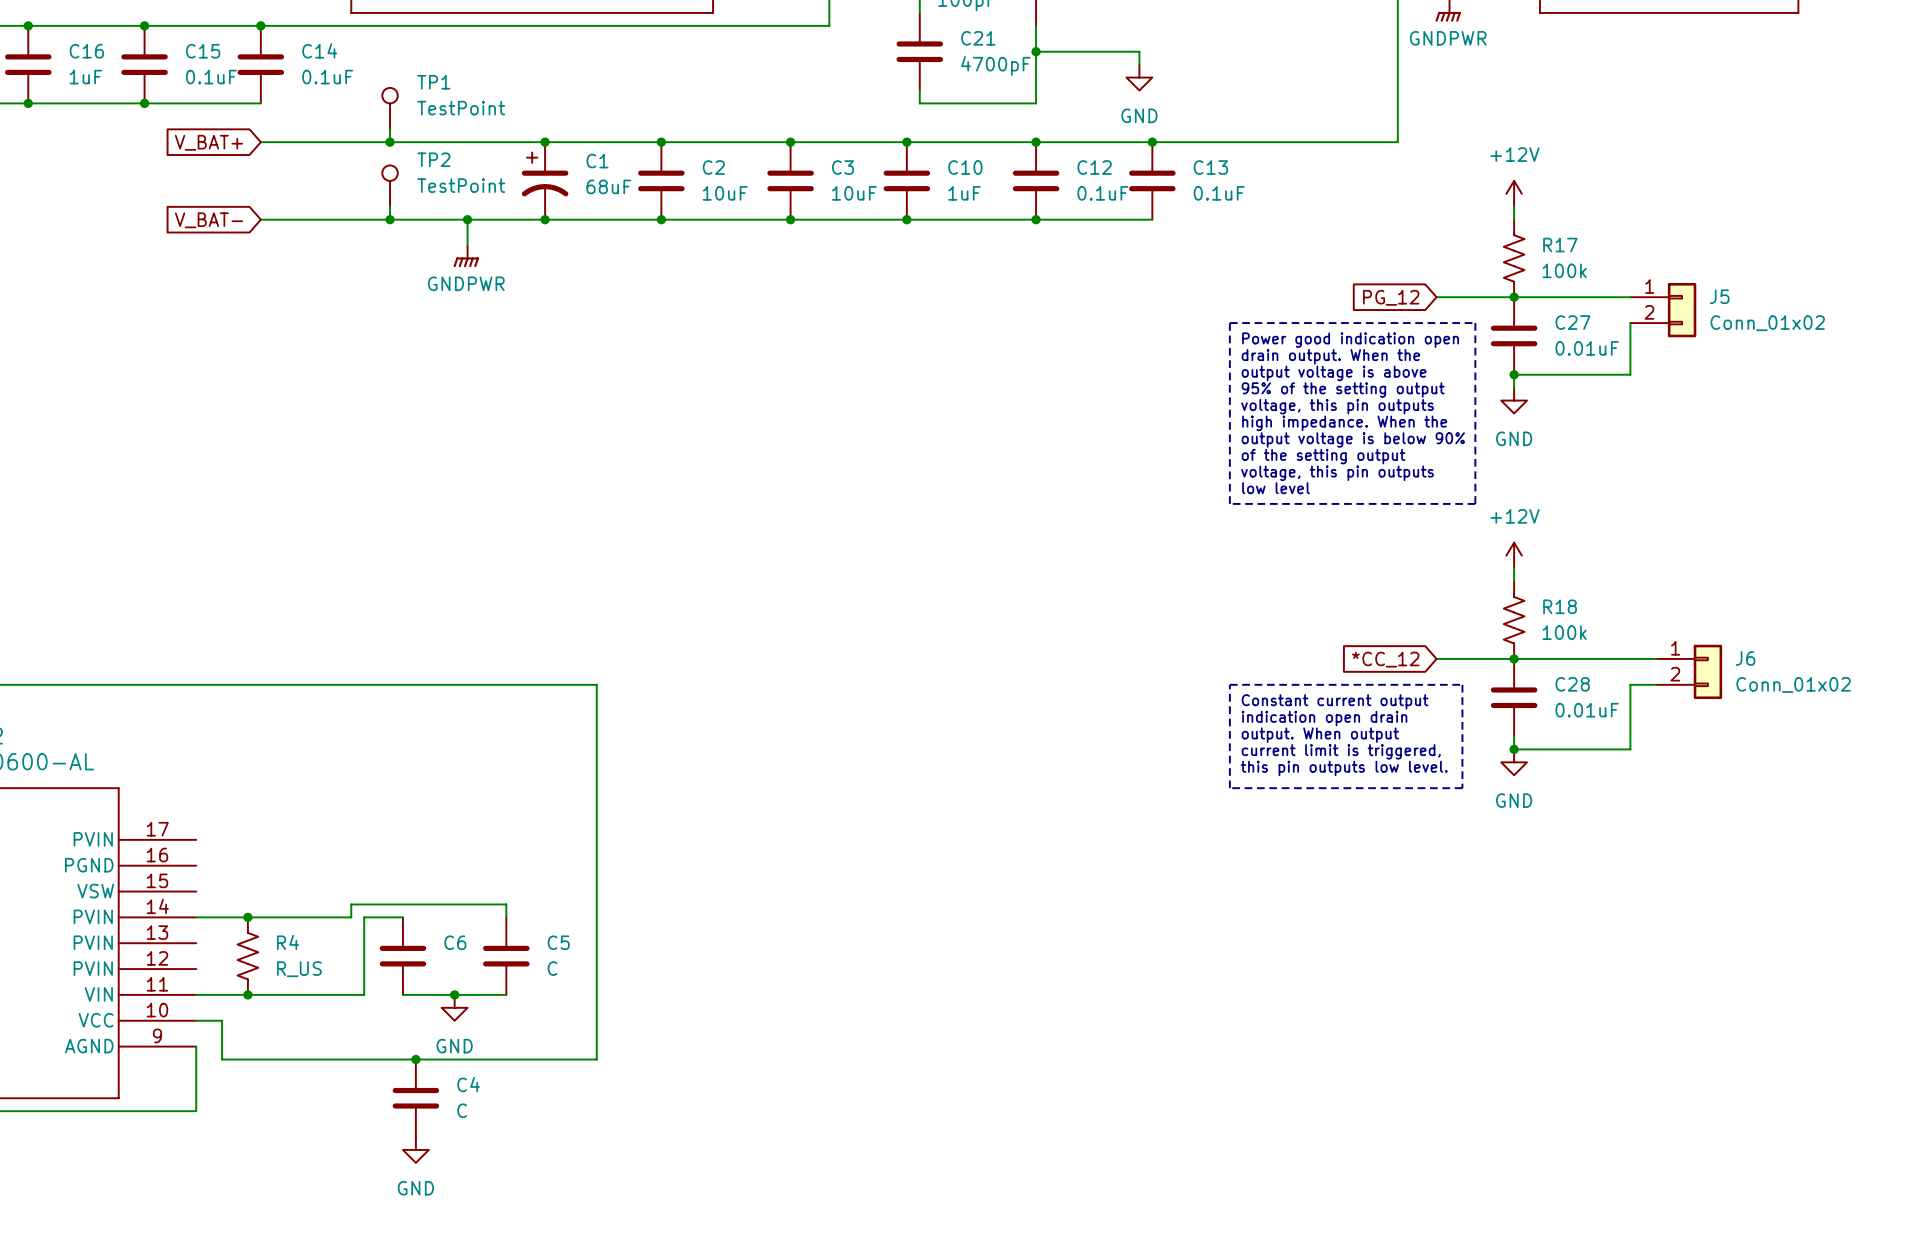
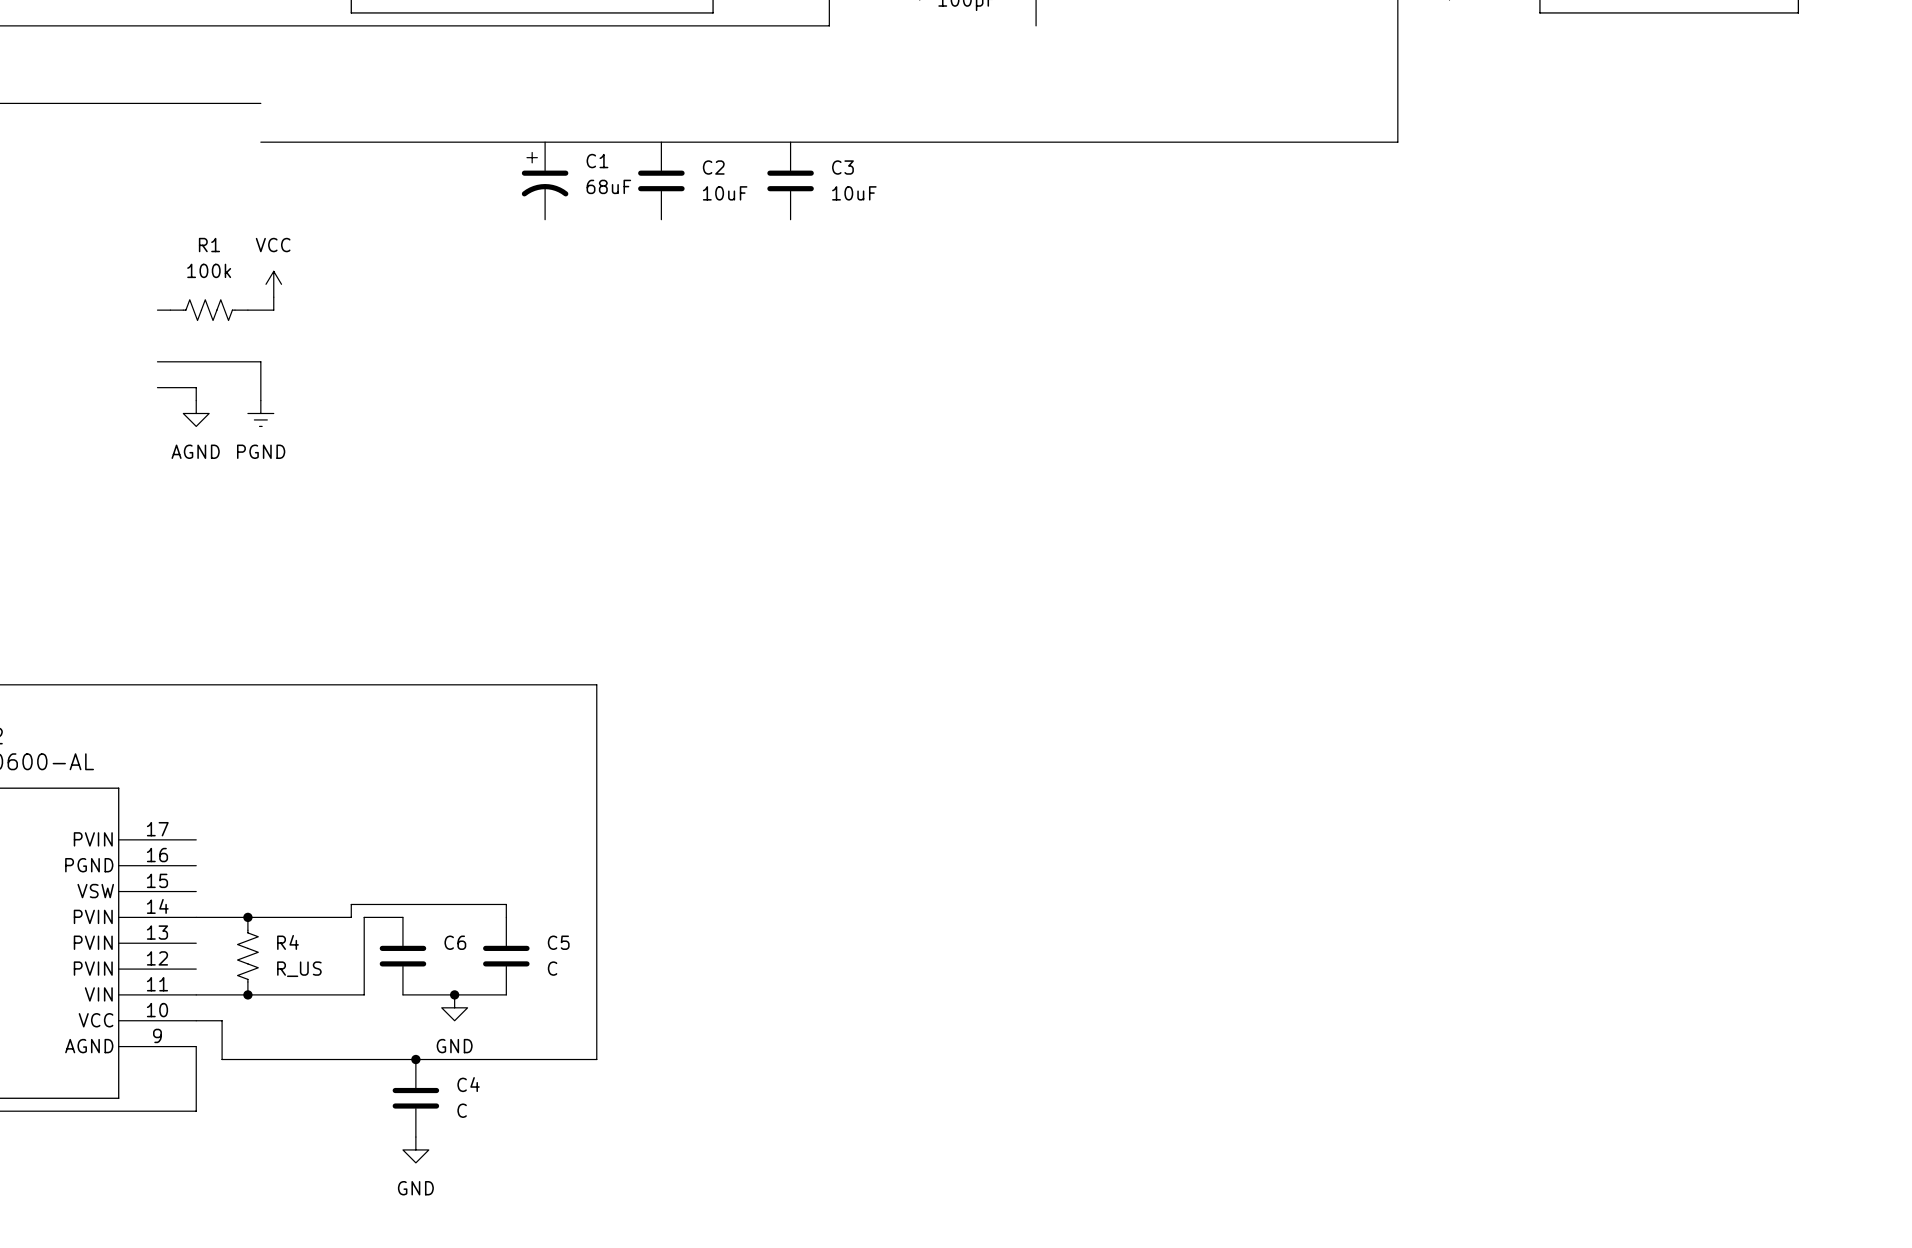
wire: (919, 0) (919, 12) -> none
power symbol: GNDPWR (1448, 10) -> none
junction: (28, 25) -> none
junction: (144, 25) -> none
junction: (260, 25) -> none
wire: (1036, 25) (1036, 103) (919, 103) (919, 90) -> none
C21: 4700pF (919, 51) -> none
wire: (1036, 51) (1139, 51) (1139, 64) -> none
junction: (1036, 51) -> none
C16: 1uF (28, 64) -> none
C15: 0.1uF (144, 64) -> none
C14: 0.1uF (260, 64) -> none
power symbol: GND (1139, 77) -> none
junction: (28, 103) -> none
junction: (144, 103) -> none
TP1: TestPoint (390, 108) -> none
wire: (390, 129) (390, 142) -> none
global label: V_BAT+ (208, 142) -> none
junction: (390, 142) -> none
junction: (545, 142) -> none
junction: (661, 142) -> none
junction: (790, 142) -> none
junction: (906, 142) -> none
junction: (1036, 142) -> none
junction: (1152, 142) -> none
C10: 1uF (906, 180) -> none
C12: 0.1uF (1036, 180) -> none
C13: 0.1uF (1152, 180) -> none
TP2: TestPoint (390, 186) -> none
power symbol: +12V (1514, 193) -> none
wire: (390, 206) (390, 219) -> none
wire: (1514, 206) (1514, 219) -> none
wire: (260, 219) (1152, 219) -> none
junction: (390, 219) -> none
wire: (467, 219) (467, 245) -> none
junction: (467, 219) -> none
junction: (545, 219) -> none
junction: (661, 219) -> none
junction: (790, 219) -> none
junction: (906, 219) -> none
junction: (1036, 219) -> none
global label: V_BAT- (208, 220) -> none
power symbol: GNDPWR (466, 256) -> none
R17: 100k (1514, 258) -> none
power symbol: none -> VCC (273, 284)
wire: none -> (273, 297) (273, 310) (247, 310)
global label: PG_12 (1391, 297) -> none
wire: (1436, 297) (1630, 297) -> none
junction: (1514, 297) -> none
wire: none -> (157, 310) (170, 310)
R1: none -> 100k (209, 310)
J5: Conn_01x02 (1663, 310) -> none
line: (1229, 323) (1229, 503) (1475, 503) (1475, 323) (1229, 323) -> none
wire: (1630, 323) (1630, 374) (1514, 374) (1514, 387) -> none
C27: 0.01uF (1514, 335) -> none
text: Power good indication open (1350, 340) -> none
text: drain output. When the (1330, 356) -> none
wire: none -> (157, 361) (260, 361) (260, 400)
text: output voltage is above (1334, 373) -> none
junction: (1514, 374) -> none
wire: none -> (157, 387) (196, 387) (196, 400)
text: 95% of the setting output (1343, 390) -> none
power symbol: GND (1514, 400) -> none
text: voltage, this pin outputs (1337, 406) -> none
power symbol: none -> AGND (196, 413)
power symbol: none -> PGND (260, 413)
text: high impedance. When the (1344, 423) -> none
text: output voltage is below 90% (1353, 439) -> none
text: of the setting output (1323, 456) -> none
text: voltage, this pin outputs (1337, 473) -> none
text: low level (1276, 488) -> none
power symbol: +12V (1514, 555) -> none
wire: (1514, 568) (1514, 581) -> none
R18: 100k (1514, 620) -> none
wire: (1436, 658) (1656, 658) -> none
junction: (1514, 658) -> none
global label: *CC_12 (1385, 659) -> none
J6: Conn_01x02 (1689, 671) -> none
line: (1229, 684) (1462, 684) (1462, 788) (1229, 788) (1229, 684) -> none
wire: (1656, 684) (1630, 684) (1630, 749) (1514, 749) (1514, 736) -> none
C28: 0.01uF (1514, 697) -> none
text: Constant current output (1335, 701) -> none
text: indication open drain (1324, 718) -> none
text: output. When output (1320, 735) -> none
junction: (1514, 749) -> none
text: current limit is triggered, (1341, 751) -> none
power symbol: GND (1514, 762) -> none
text: this pin outputs low level. (1344, 768) -> none

